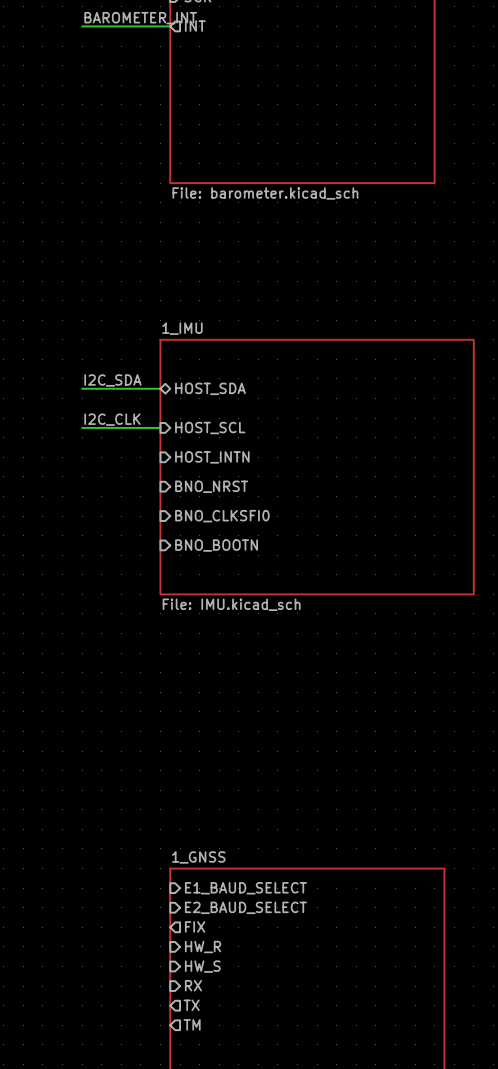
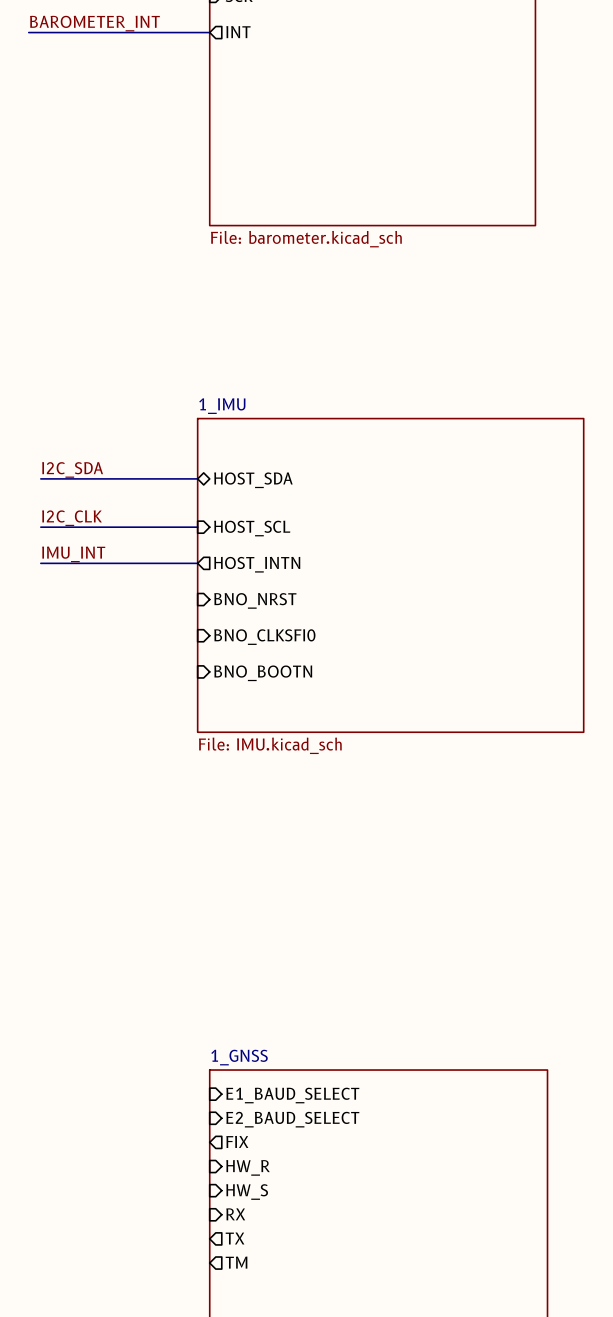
label position: BAROMETER_INT (140, 18) -> BAROMETER_INT (94, 23)
wire: none -> (28, 32) (101, 32)
label position: I2C_SDA (112, 380) -> I2C_SDA (72, 469)
wire: none -> (40, 478) (101, 478)
label position: I2C_CLK (112, 419) -> I2C_CLK (71, 518)
wire: none -> (40, 527) (101, 527)
label: none -> IMU_INT (73, 554)
wire: none -> (40, 563) (197, 563)
sheet pin shape: input (212, 457) -> output (257, 564)

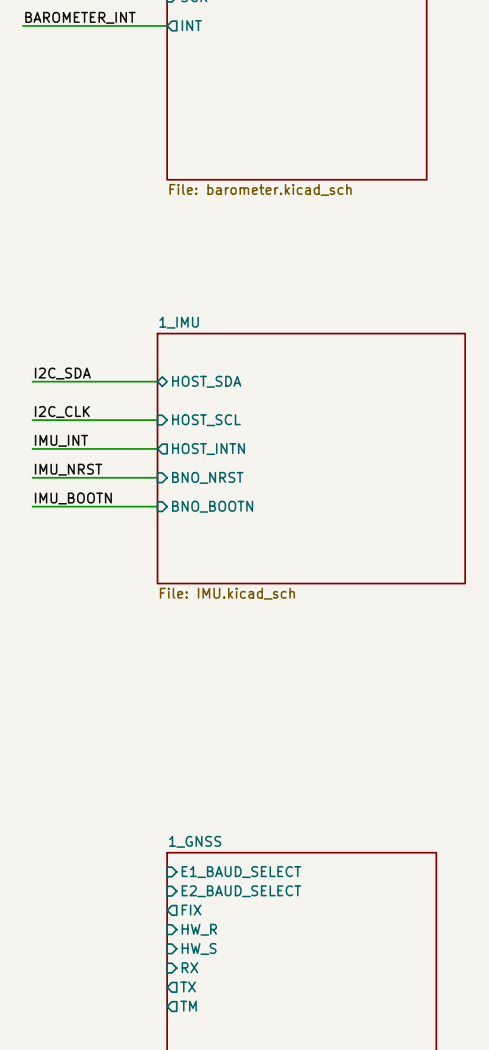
label: none -> IMU_NRST (68, 469)
wire: none -> (32, 477) (157, 477)
label: none -> IMU_BOOTN (73, 498)
wire: none -> (32, 506) (157, 506)
sheet pin: BNO_CLKSFI0 (264, 637) -> BNO_BOOTN (212, 506)
sheet pin: BNO_BOOTN (263, 673) -> none

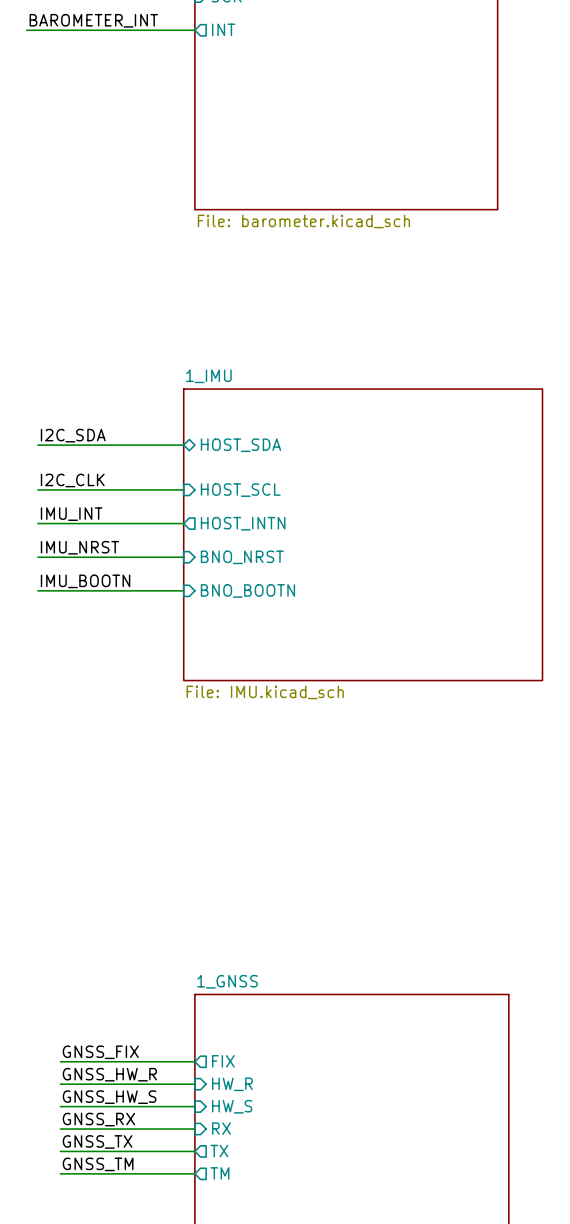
sheet pin: E1_BAUD_SELECT (241, 872) -> none
sheet pin: E2_BAUD_SELECT (241, 891) -> none
label: none -> GNSS_FIX (100, 1052)
wire: none -> (60, 1061) (194, 1061)
label: none -> GNSS_HW_R (109, 1074)
wire: none -> (60, 1084) (194, 1084)
label: none -> GNSS_HW_S (109, 1097)
wire: none -> (60, 1106) (194, 1106)
label: none -> GNSS_RX (98, 1119)
wire: none -> (60, 1129) (194, 1129)
label: none -> GNSS_TX (97, 1141)
wire: none -> (60, 1151) (194, 1151)
label: none -> GNSS_TM (98, 1164)
wire: none -> (60, 1173) (194, 1173)

